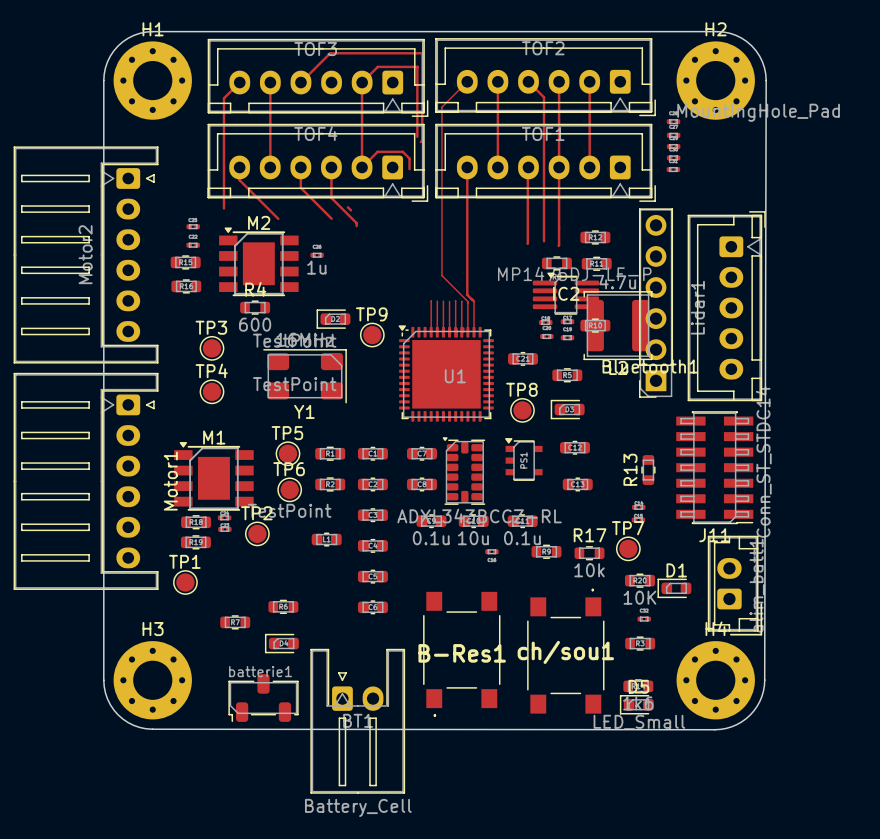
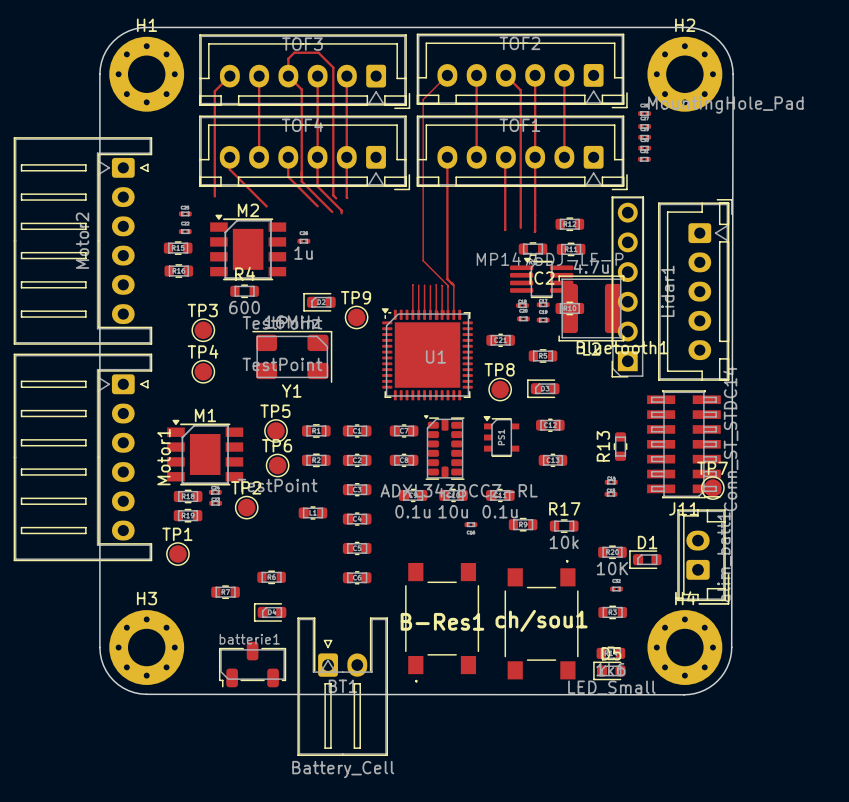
top track: (417, 66) (377, 66) (362, 82) -> none
top track: (417, 66) (417, 136) -> none
top track: (300, 82) (330, 53) (422, 53) (420, 142) -> none
top track: none -> (317, 76) (317, 157)
top track: none -> (346, 157) (347, 198)
top track: (409, 169) (409, 158) (402, 151) (377, 151) (359, 169) -> none
top track: none -> (333, 195) (333, 67) (318, 52) (294, 52) (288, 58) (288, 76) (301, 89) (301, 181) (332, 211)
TP7 position: (628, 548) -> (712, 488)

